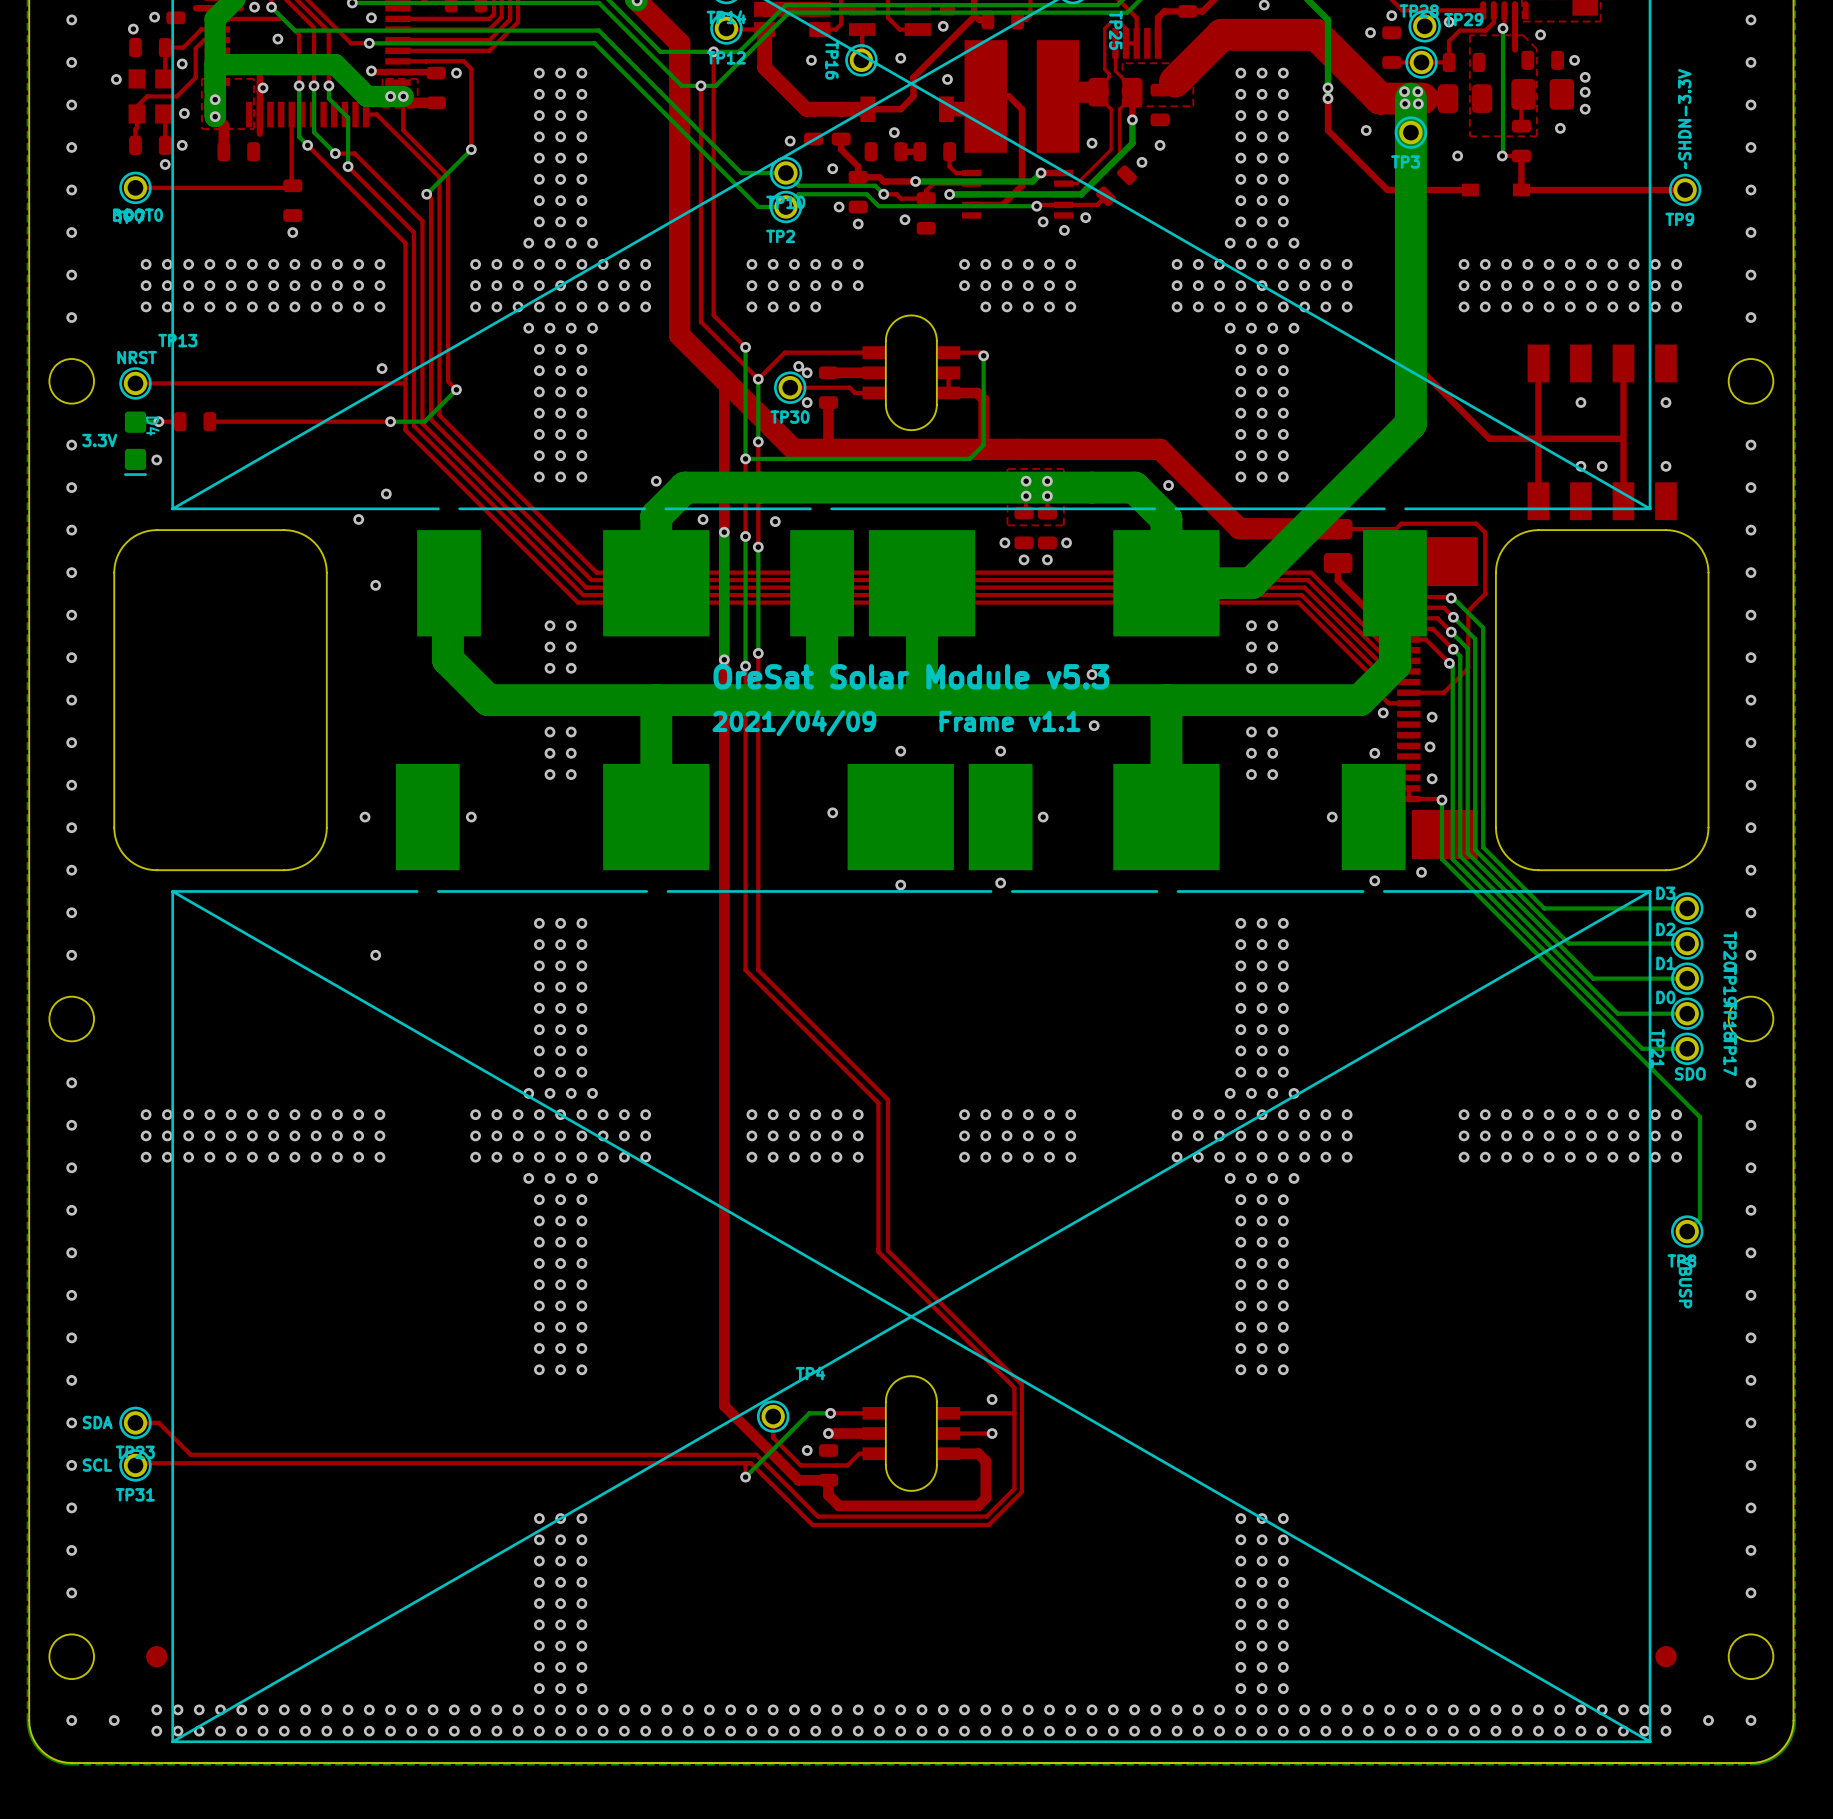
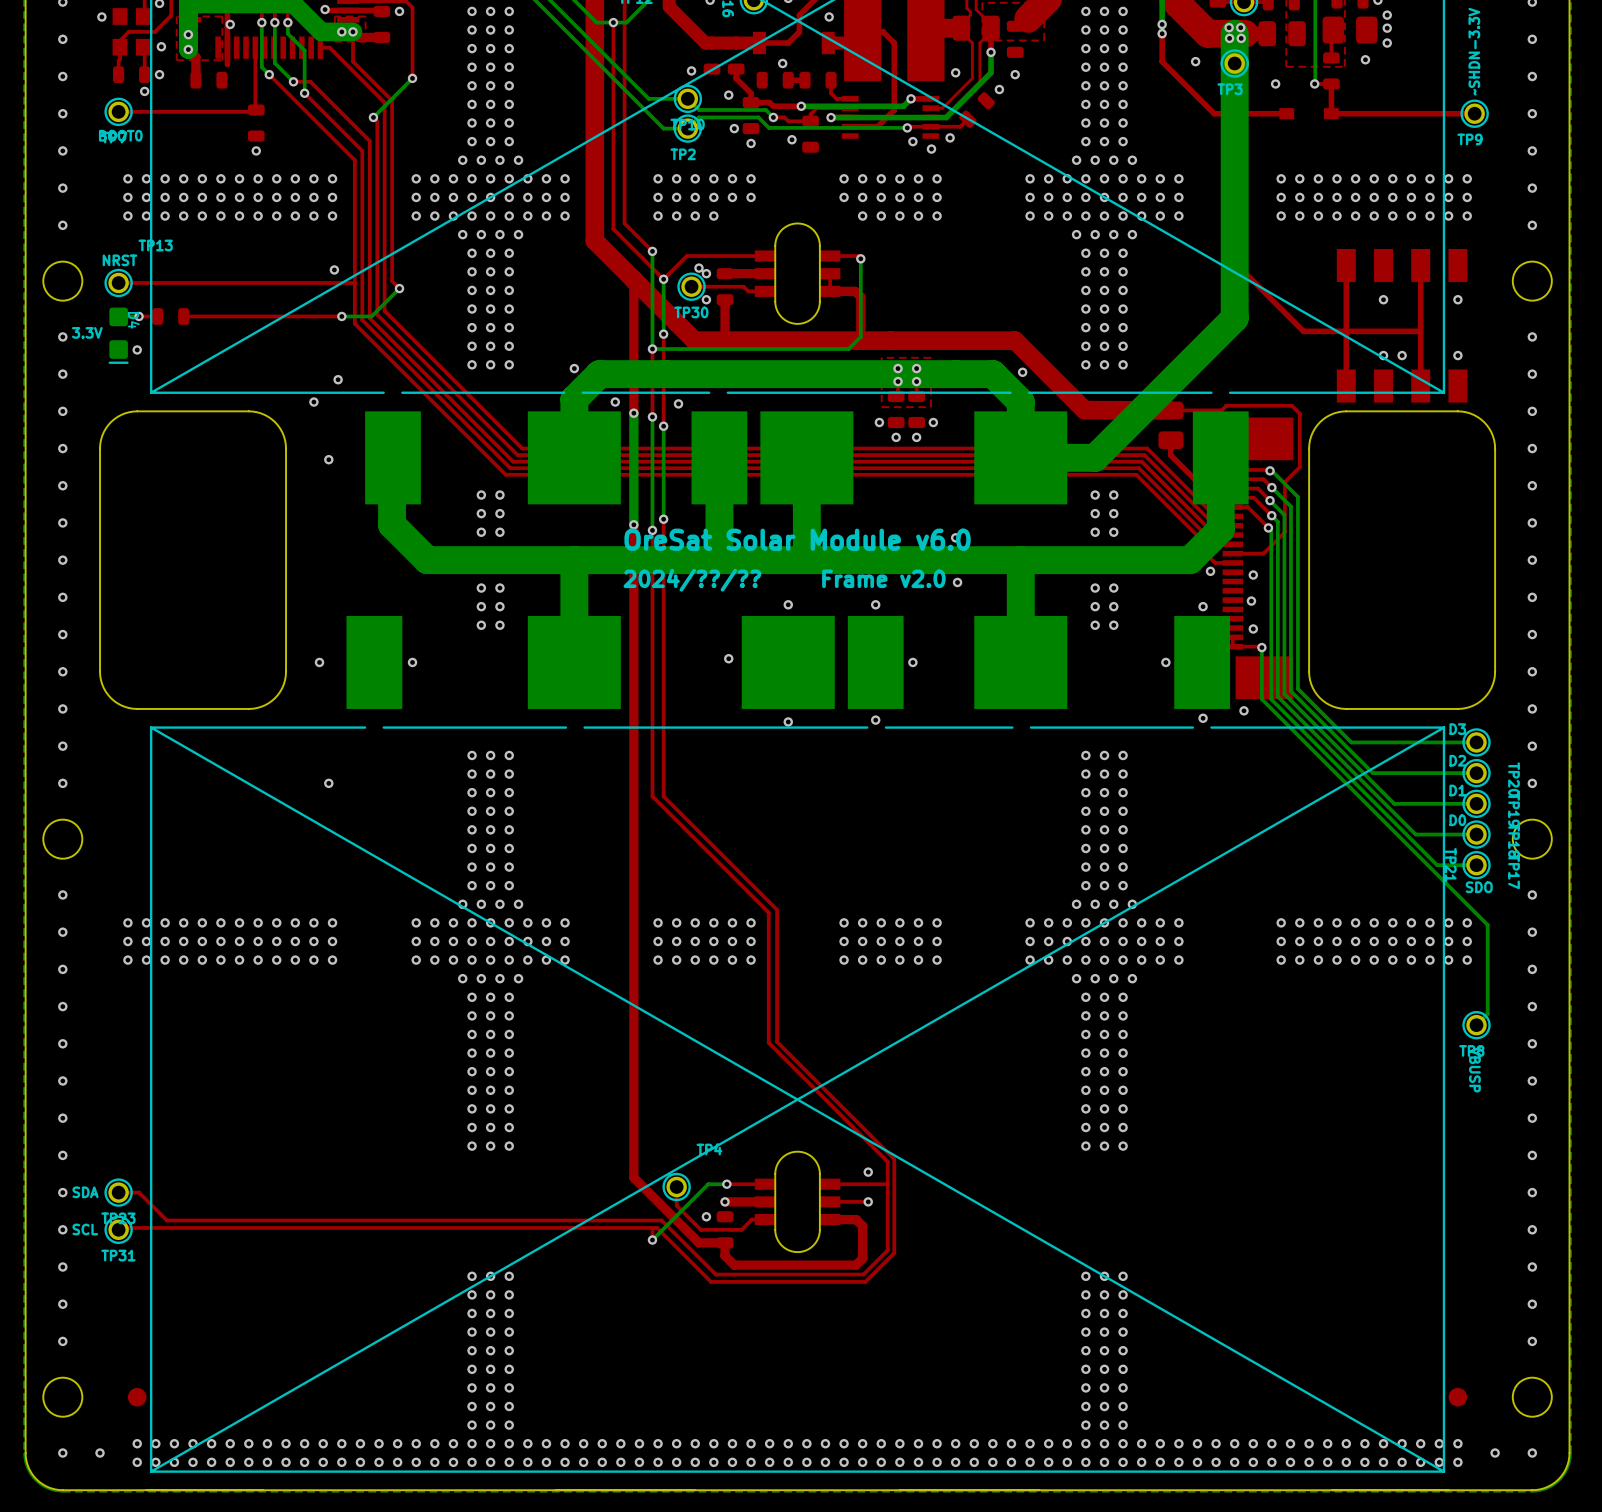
text: OreSat Solar Module v5.3 (911, 676) -> OreSat Solar Module v6.0 (797, 539)
text: Frame v1.1 (1010, 721) -> Frame v2.0 (883, 578)
text: 2021/04/09 (794, 723) -> 2024/??/?? (692, 580)

